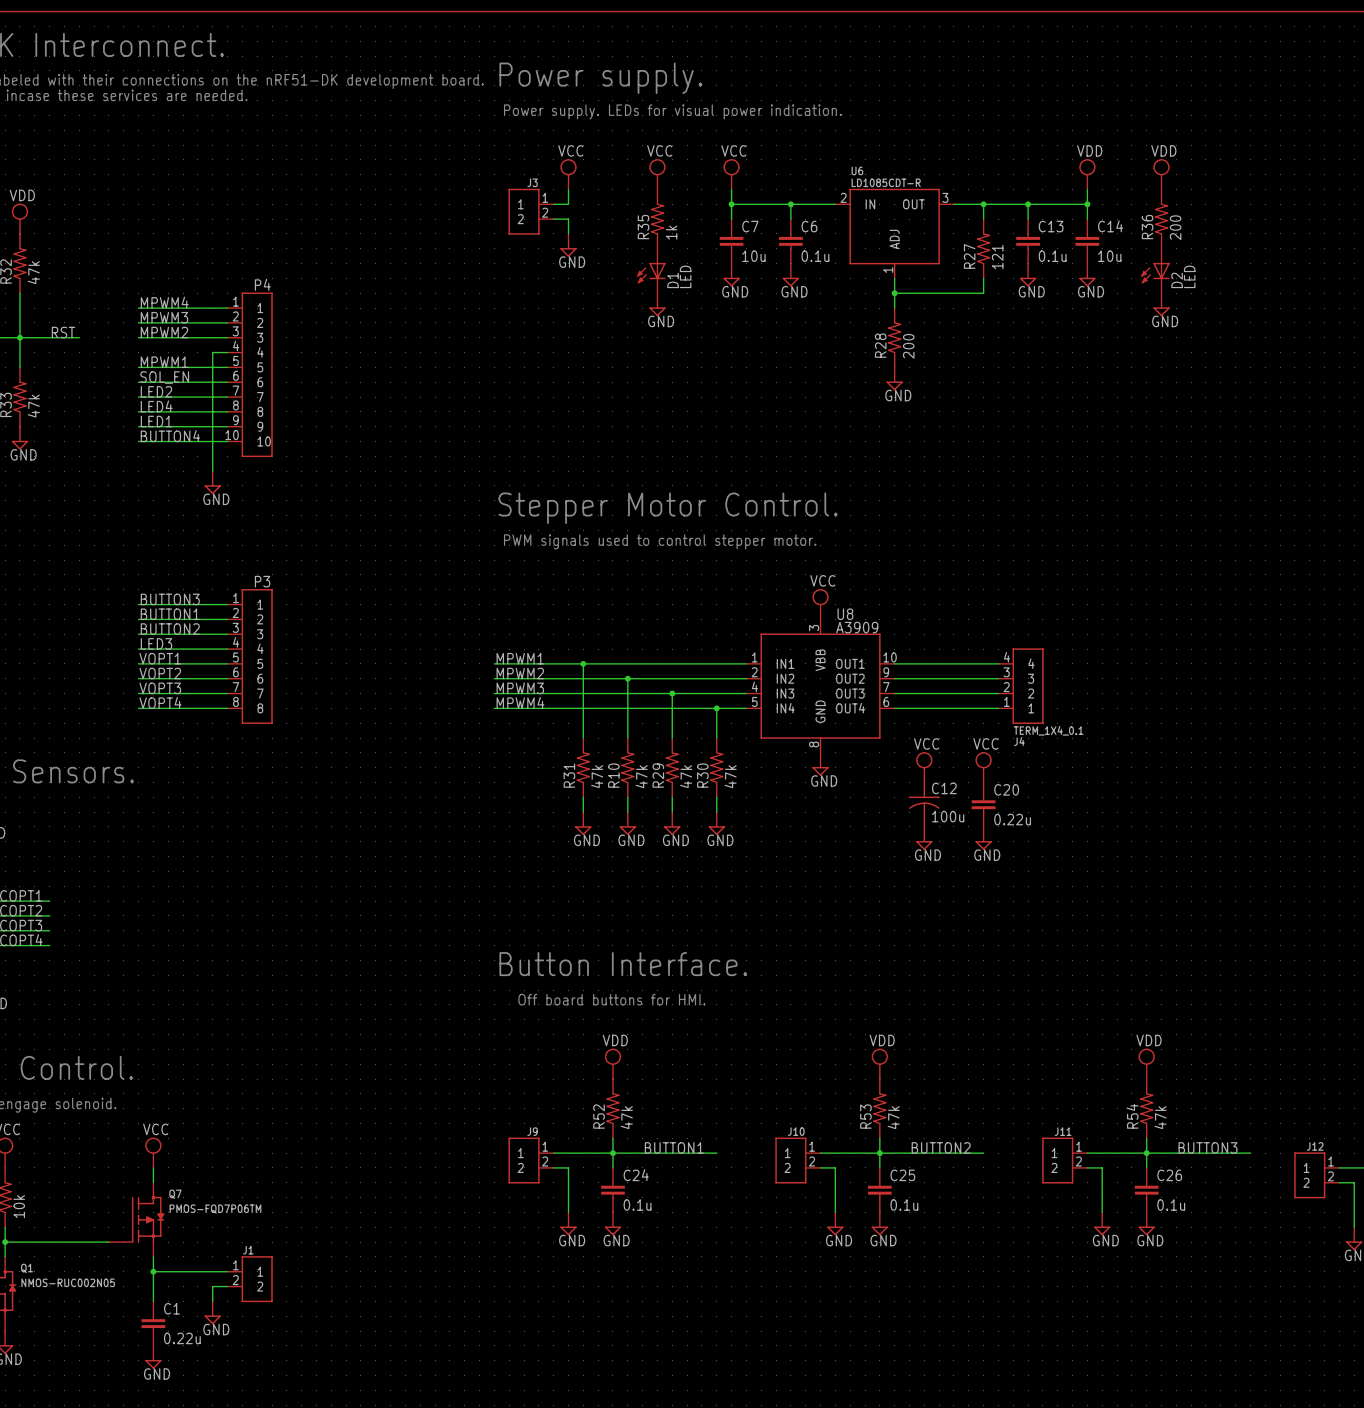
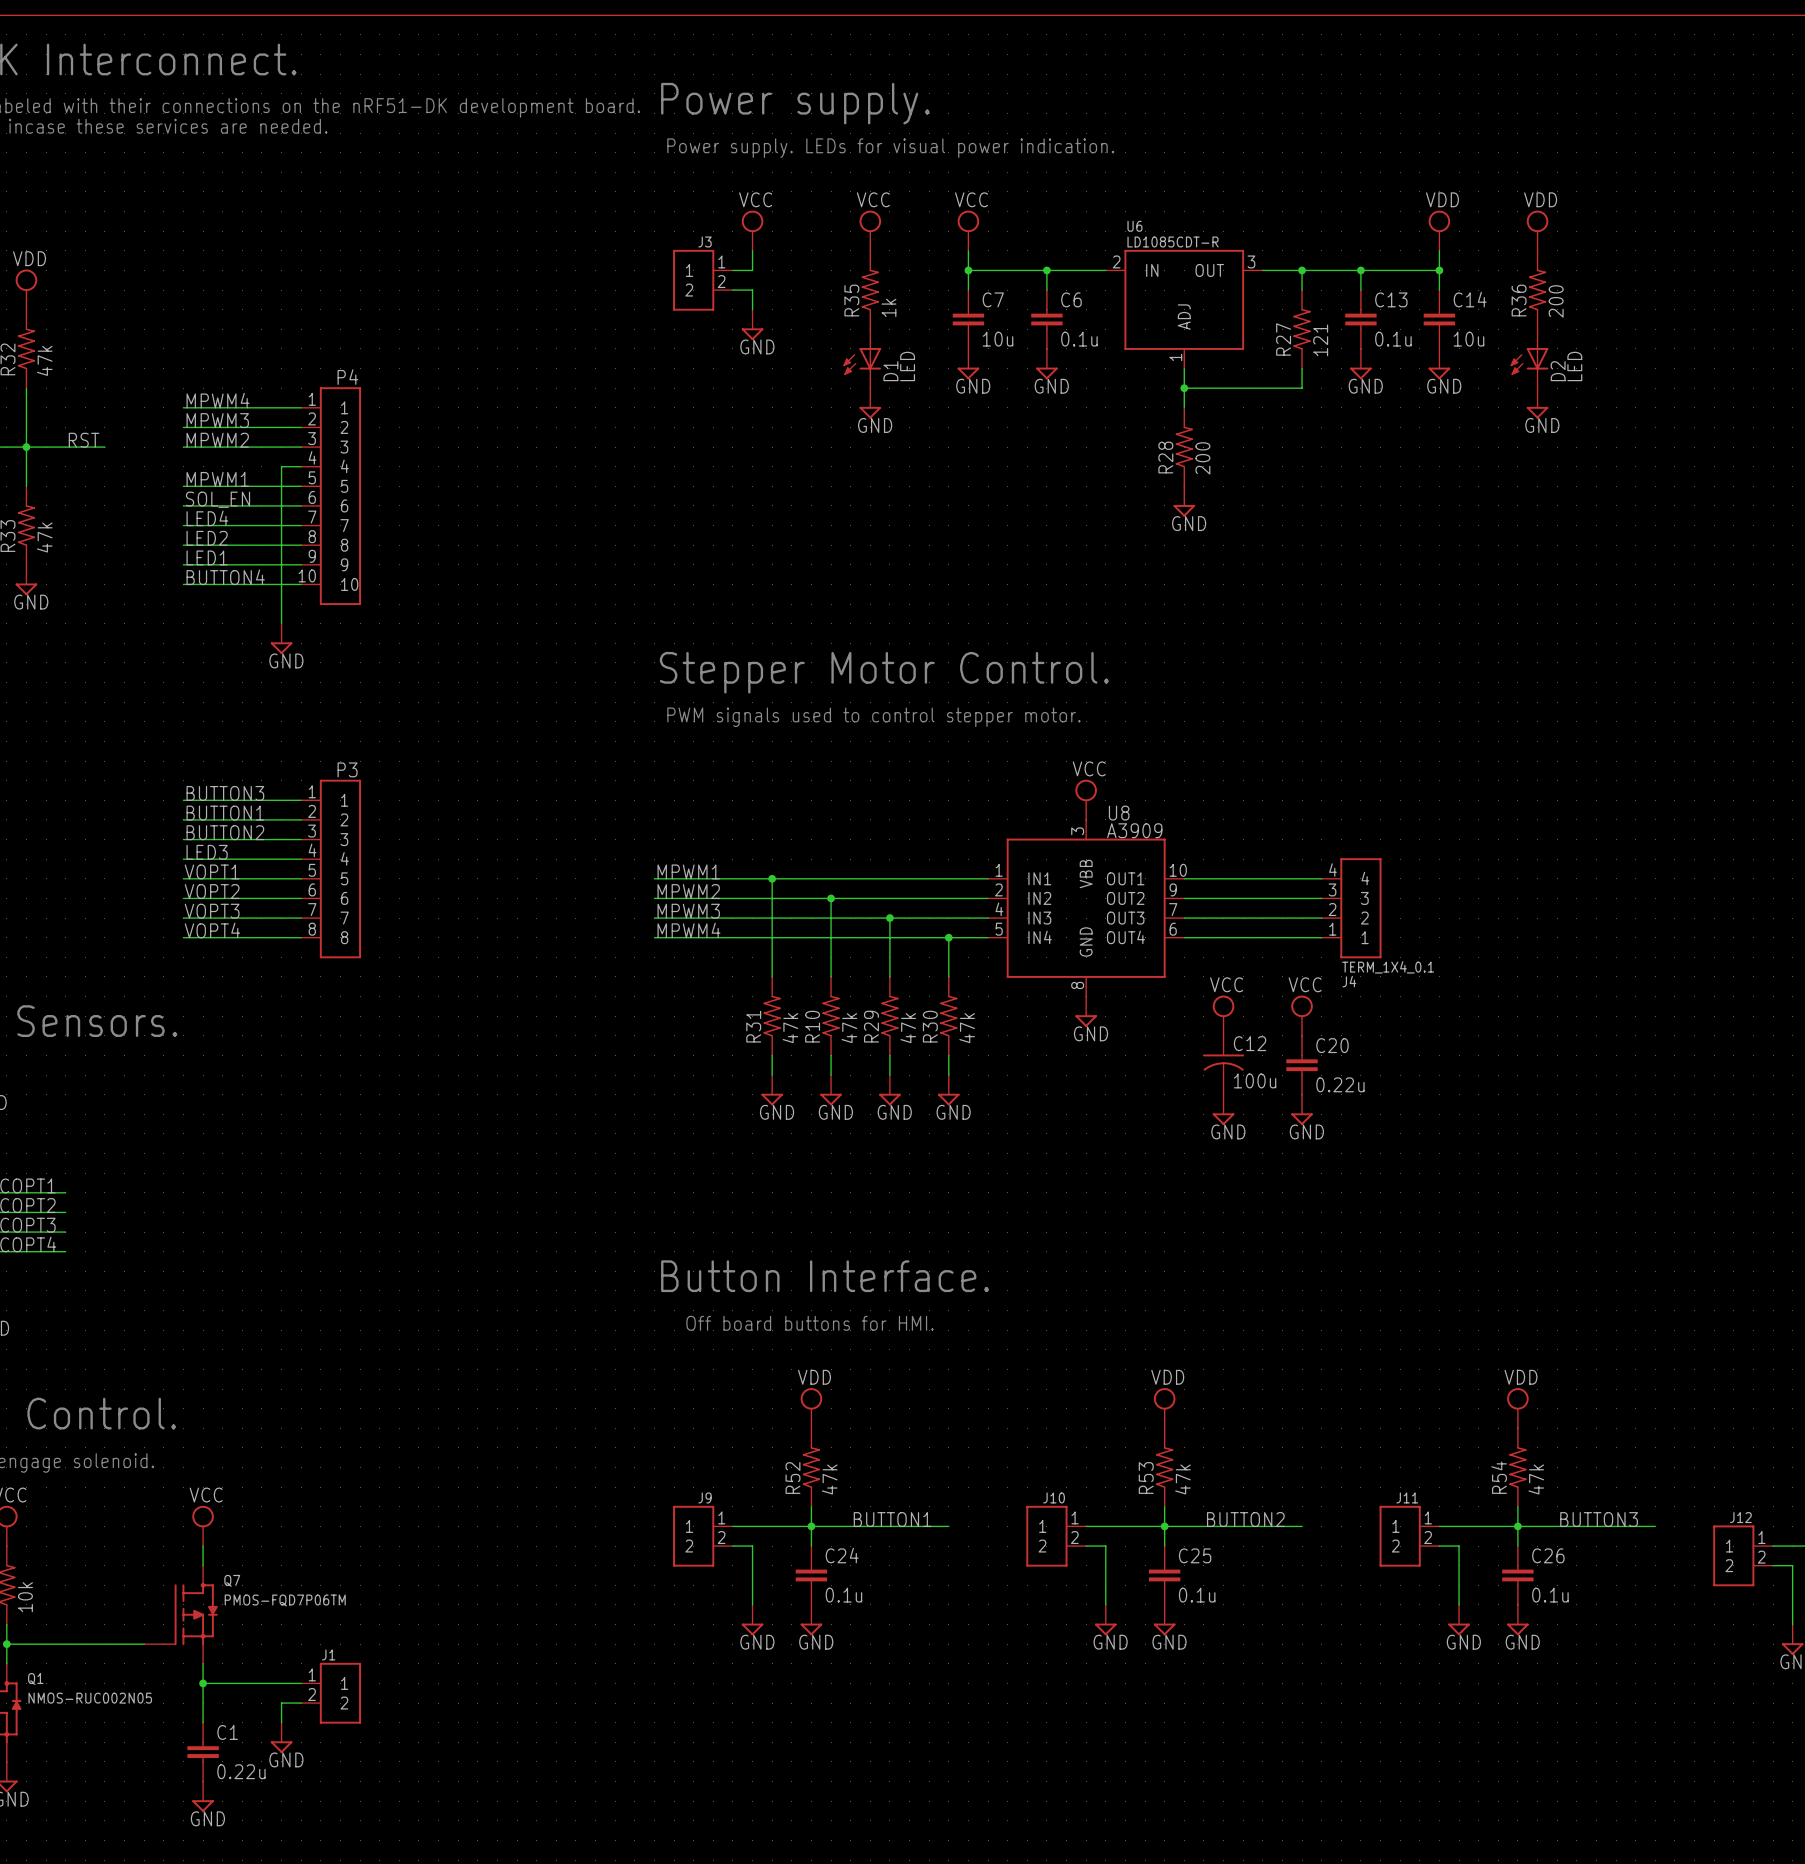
label: LED2 (156, 391) -> LED4 (207, 518)
label: LED4 (156, 406) -> LED2 (207, 538)

